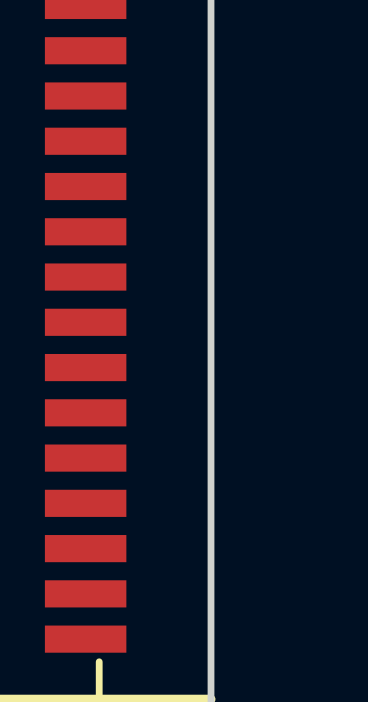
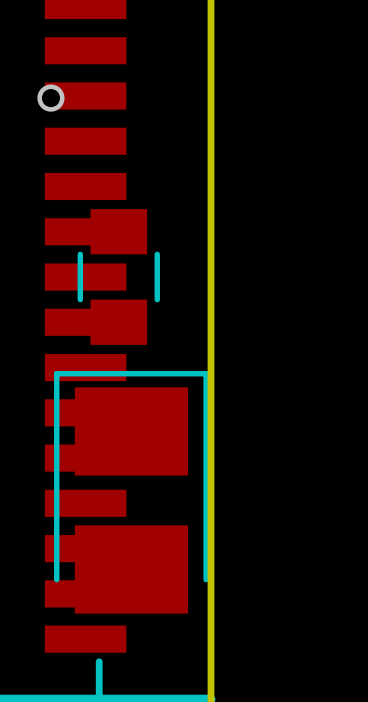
via: none -> (50, 98)
part: none -> (118, 276)
part: none -> (131, 492)

